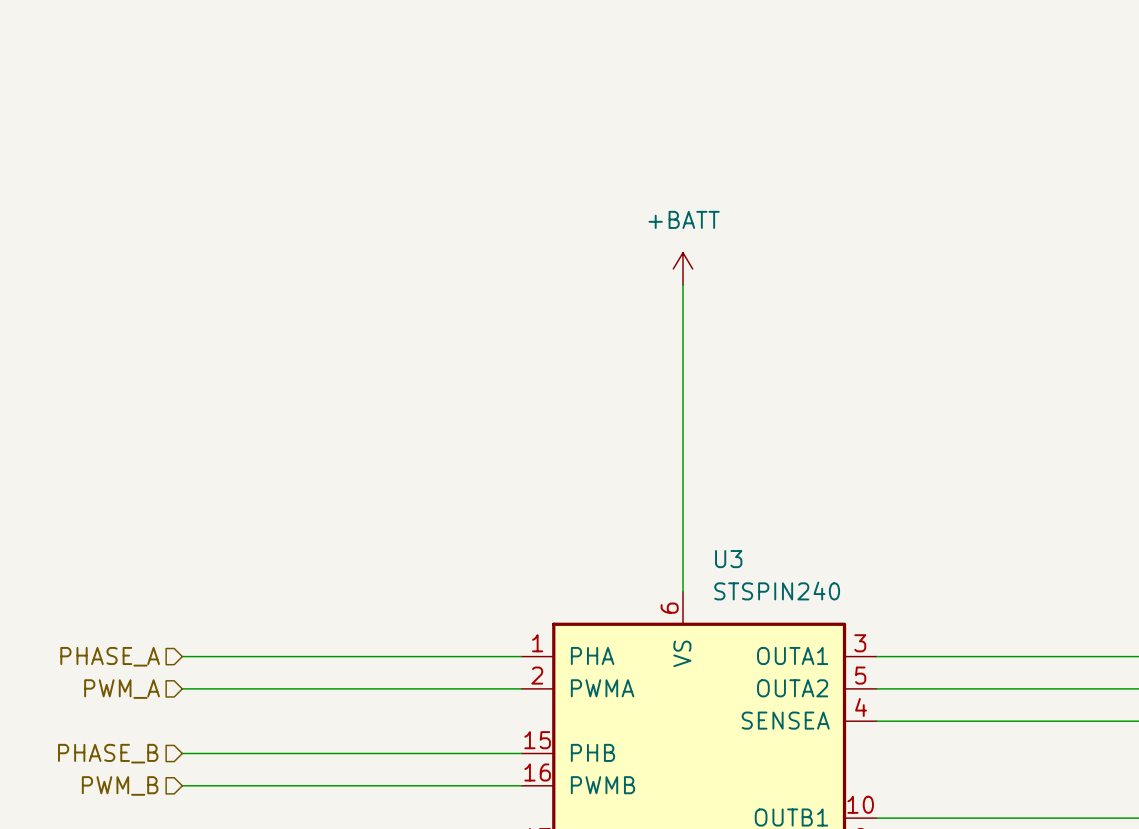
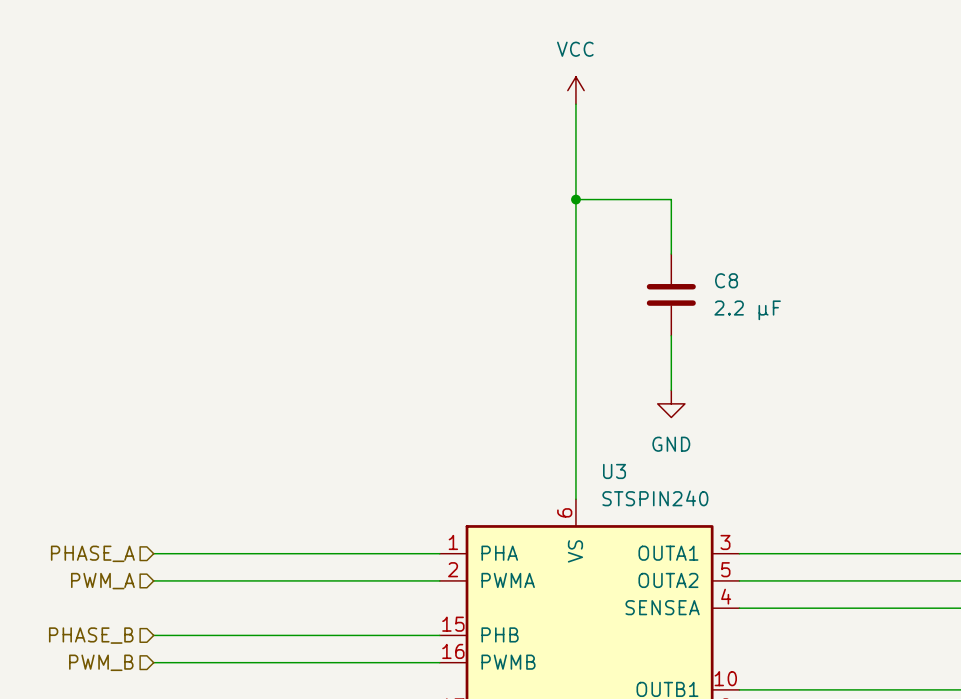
power symbol: none -> VCC (575, 90)
wire: none -> (575, 104) (575, 240)
wire: none -> (575, 199) (671, 199) (671, 254)
junction: none -> (575, 199)
power symbol: +BATT (683, 268) -> none
C8: none -> 2.2 µF (671, 294)
wire: none -> (671, 335) (671, 390)
power symbol: none -> GND (671, 403)

